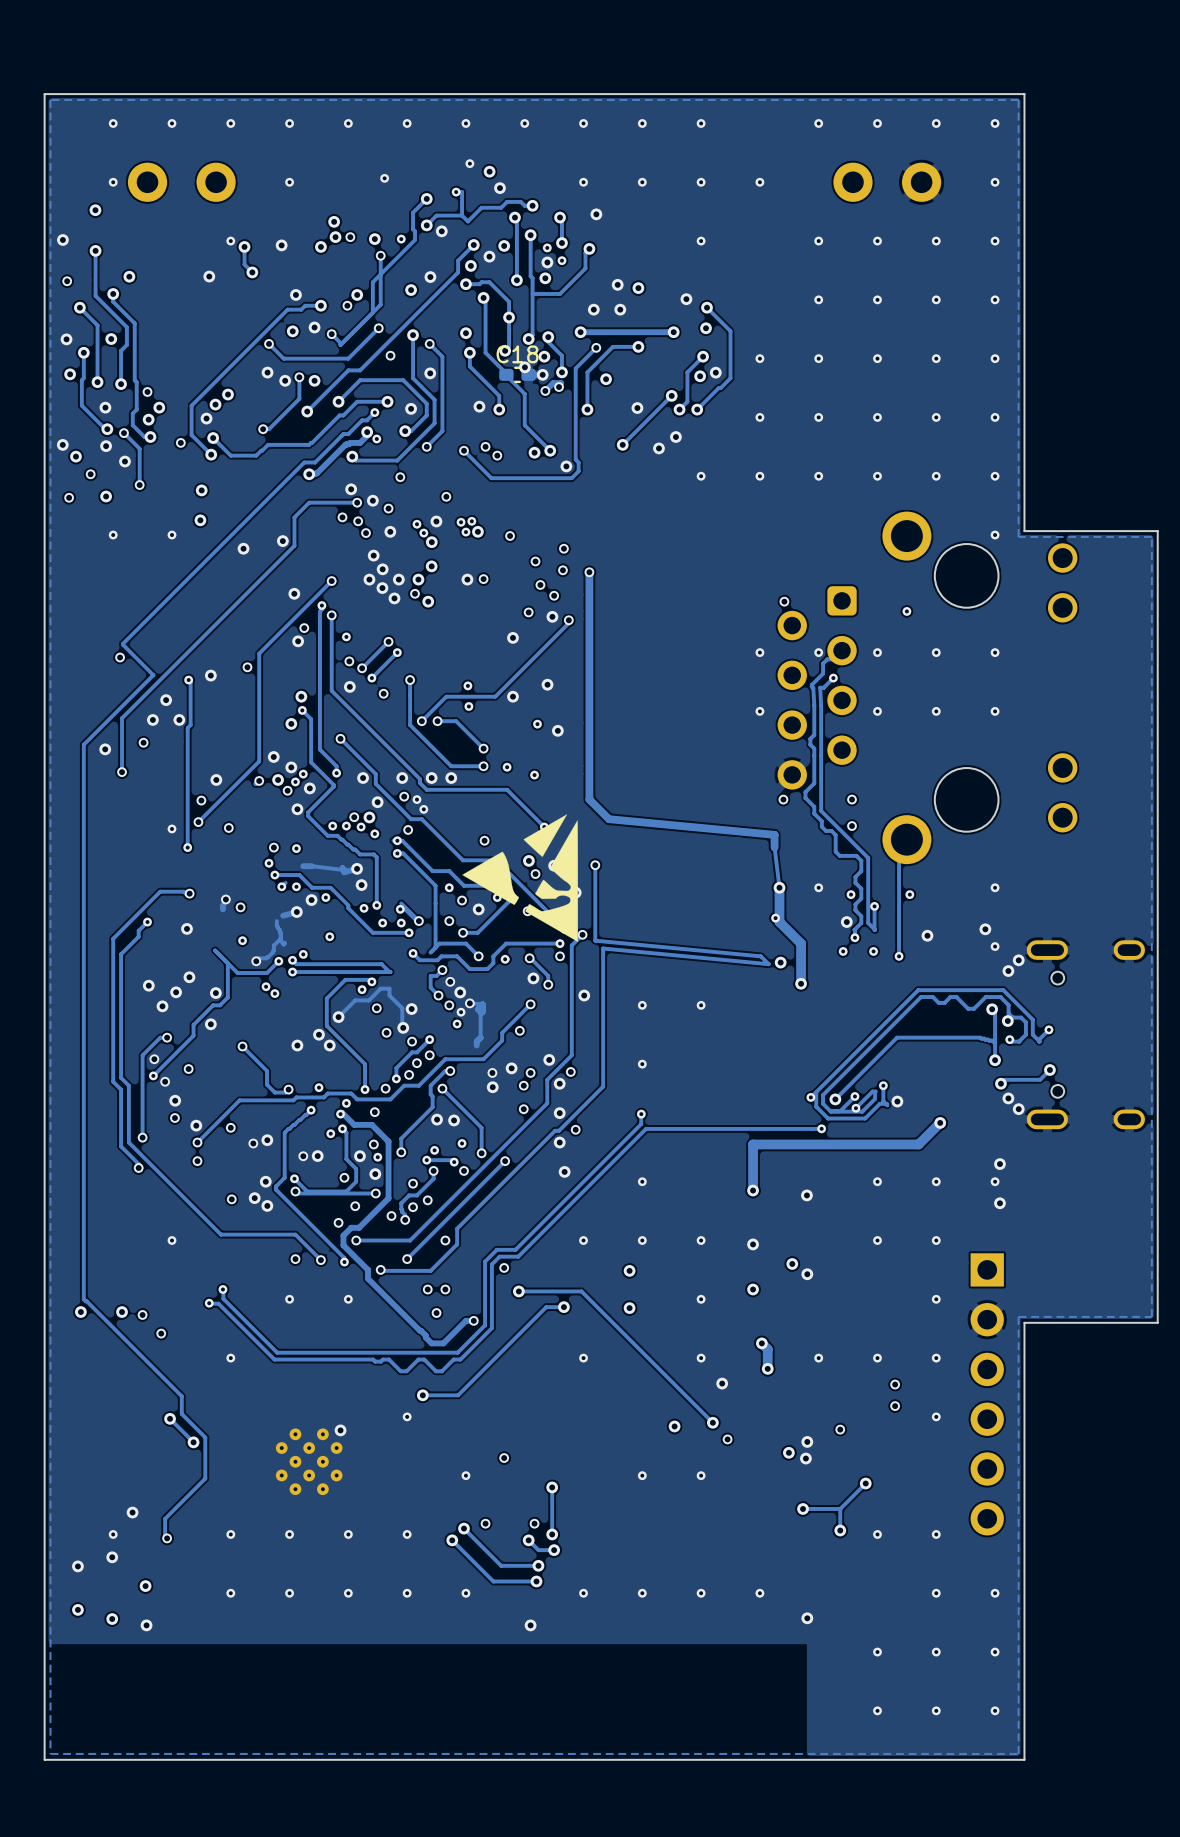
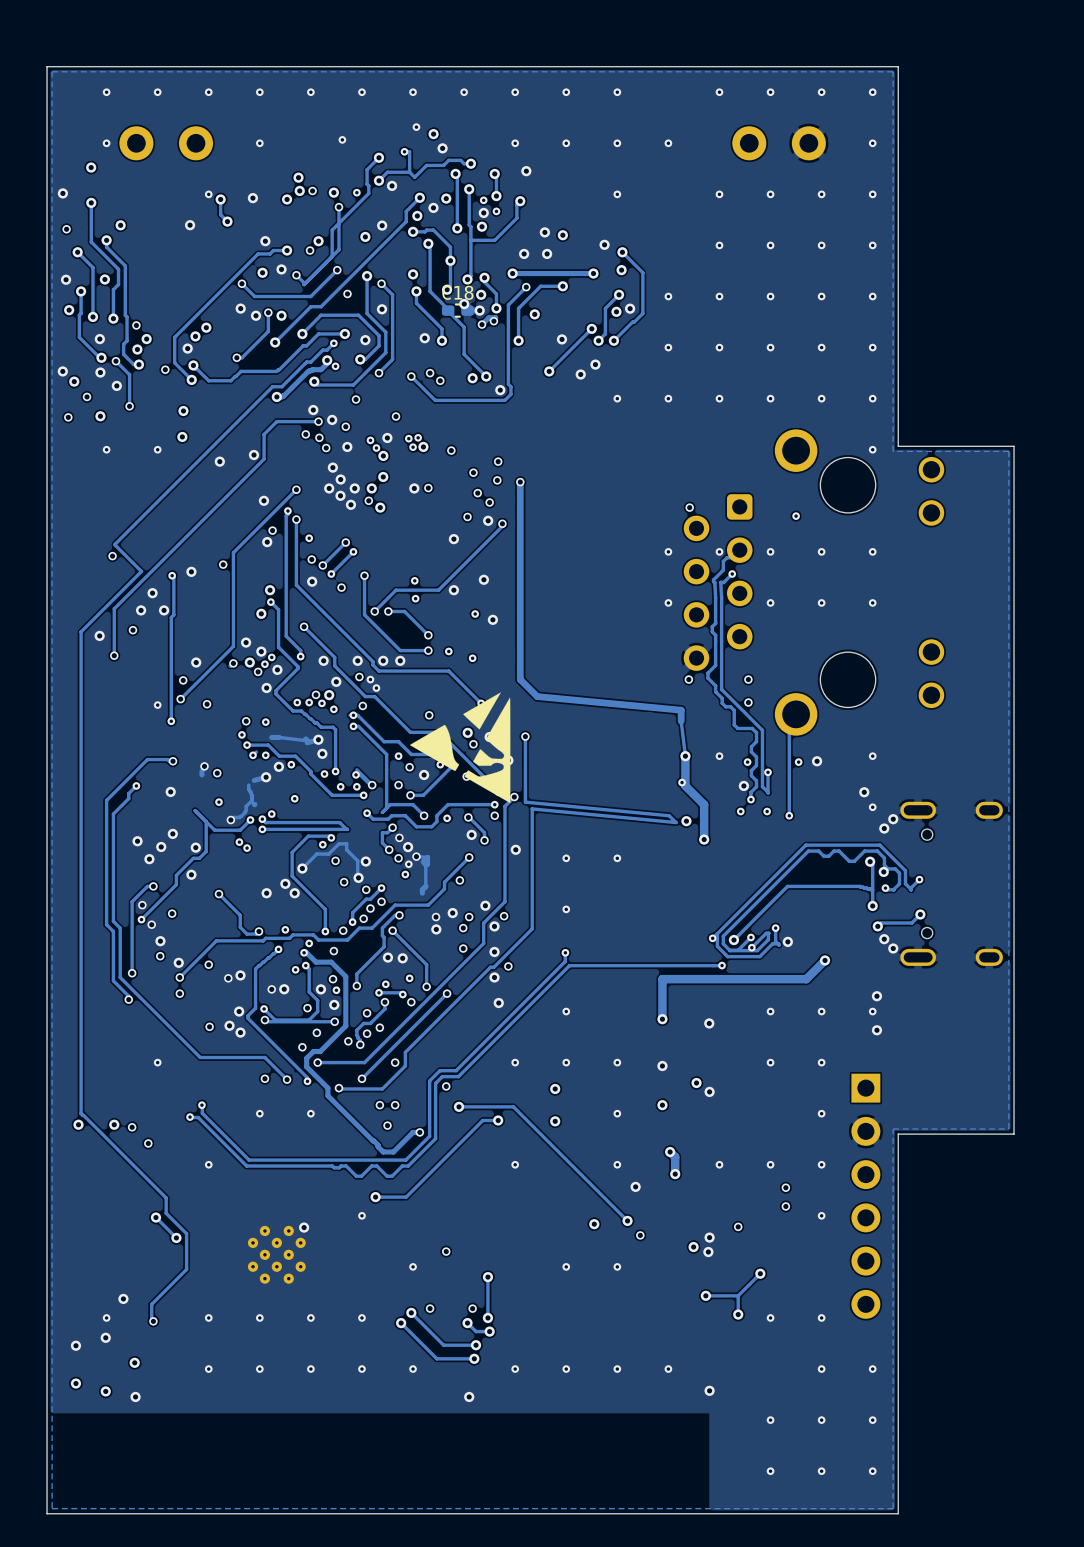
via position: (927, 935) -> (817, 761)

